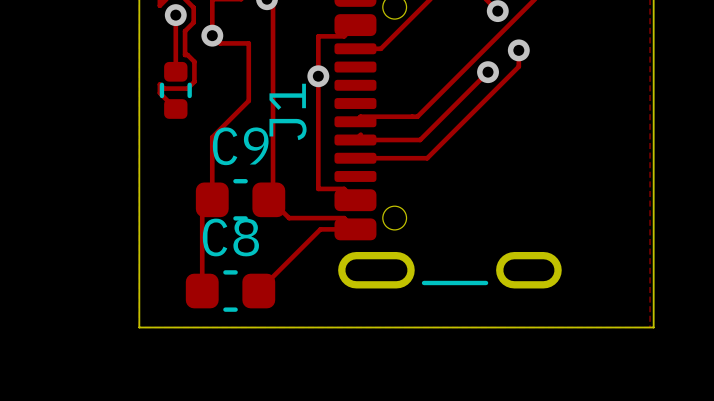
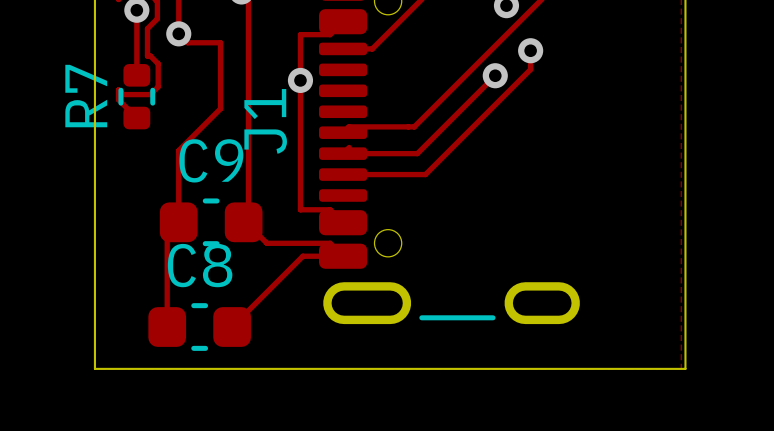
R7 name: none -> R7 (86, 96)

